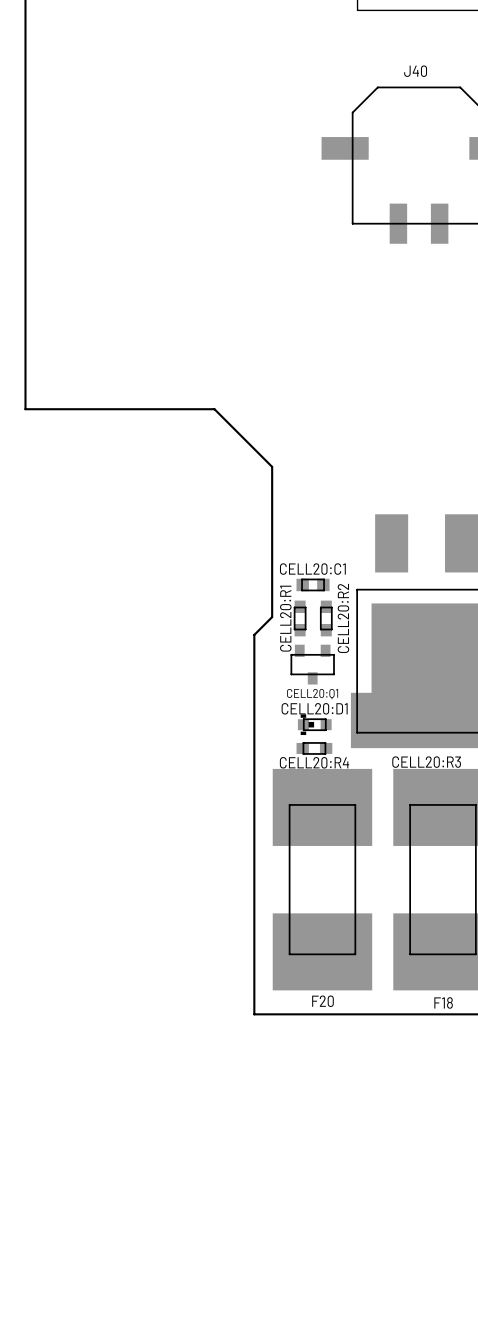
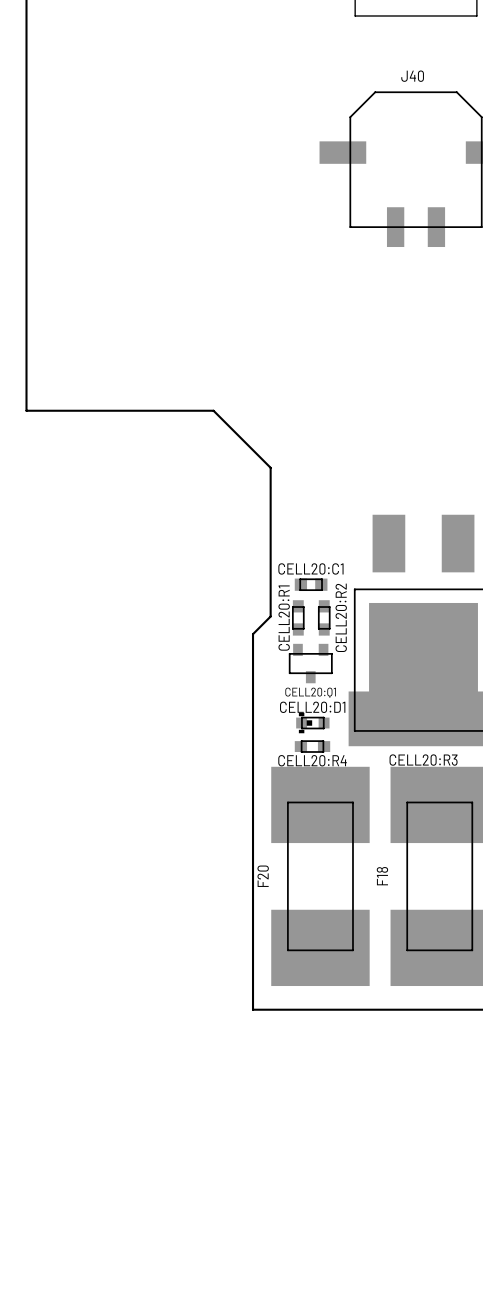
F20 name rotation: 0° (322, 1001) -> 90° counterclockwise (263, 876)
F20 name position: F20 (322, 1001) -> F20 (263, 876)
F18 name rotation: 0° (443, 1002) -> 90° counterclockwise (382, 876)
F18 name position: F18 (443, 1002) -> F18 (382, 876)

